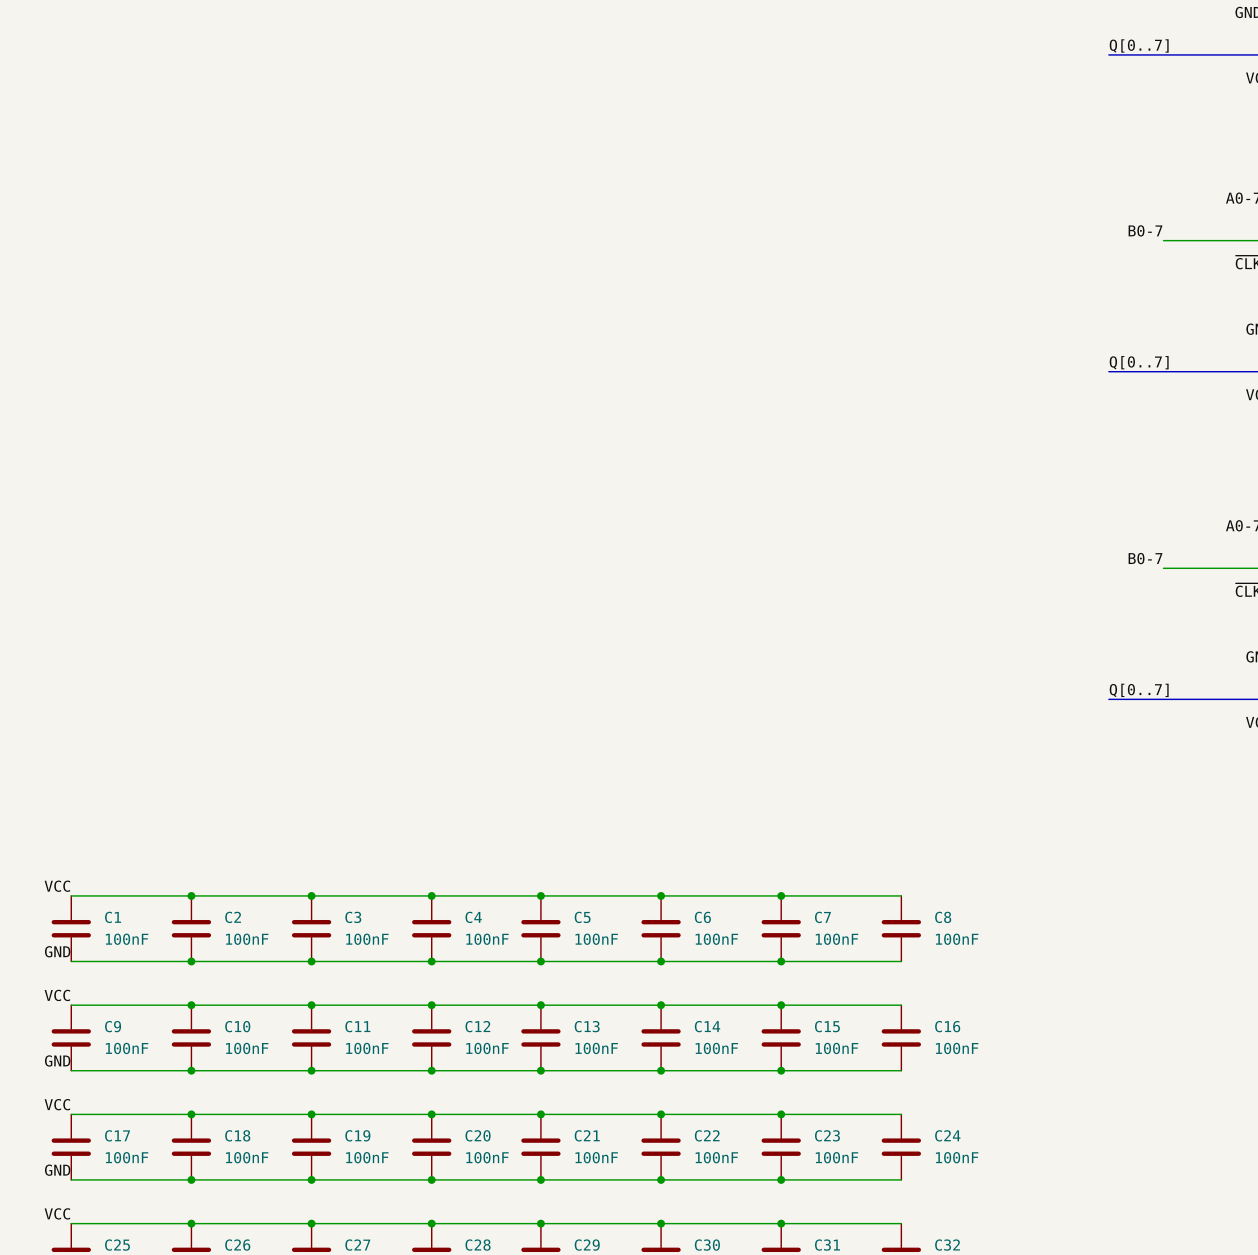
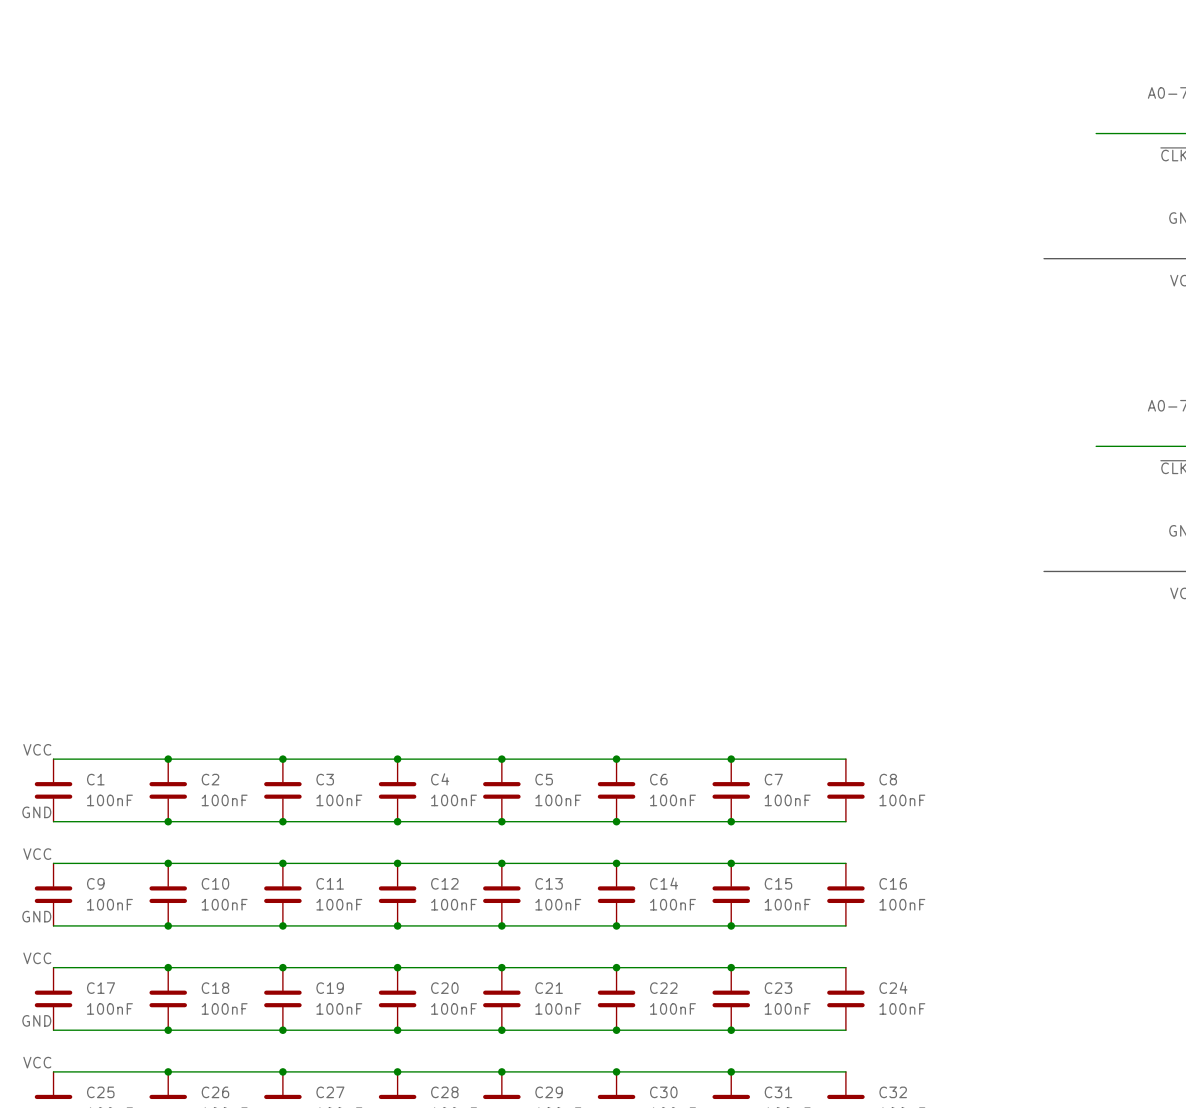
label: B0-7 (1145, 230) -> none
label: Q[0..7] (1139, 362) -> none
label: B0-7 (1145, 558) -> none
label: Q[0..7] (1139, 690) -> none

